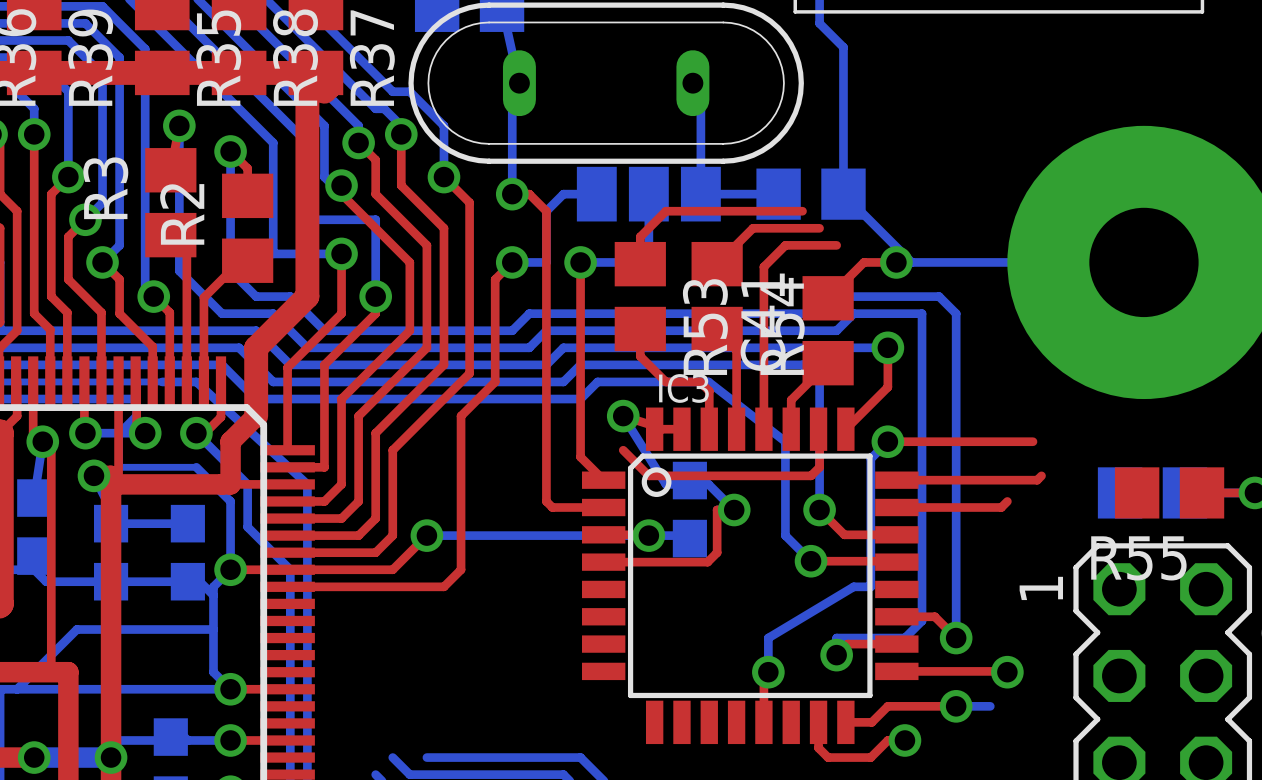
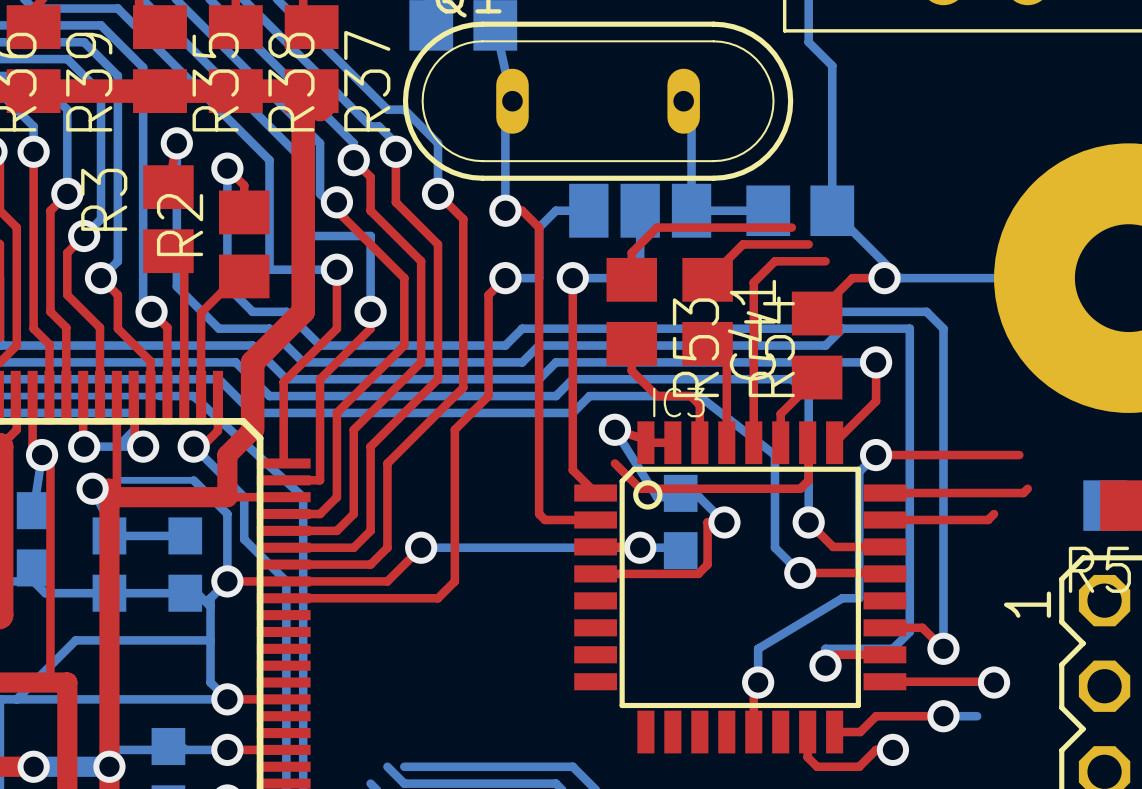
bottom track: none -> (404, 766) (421, 766)

